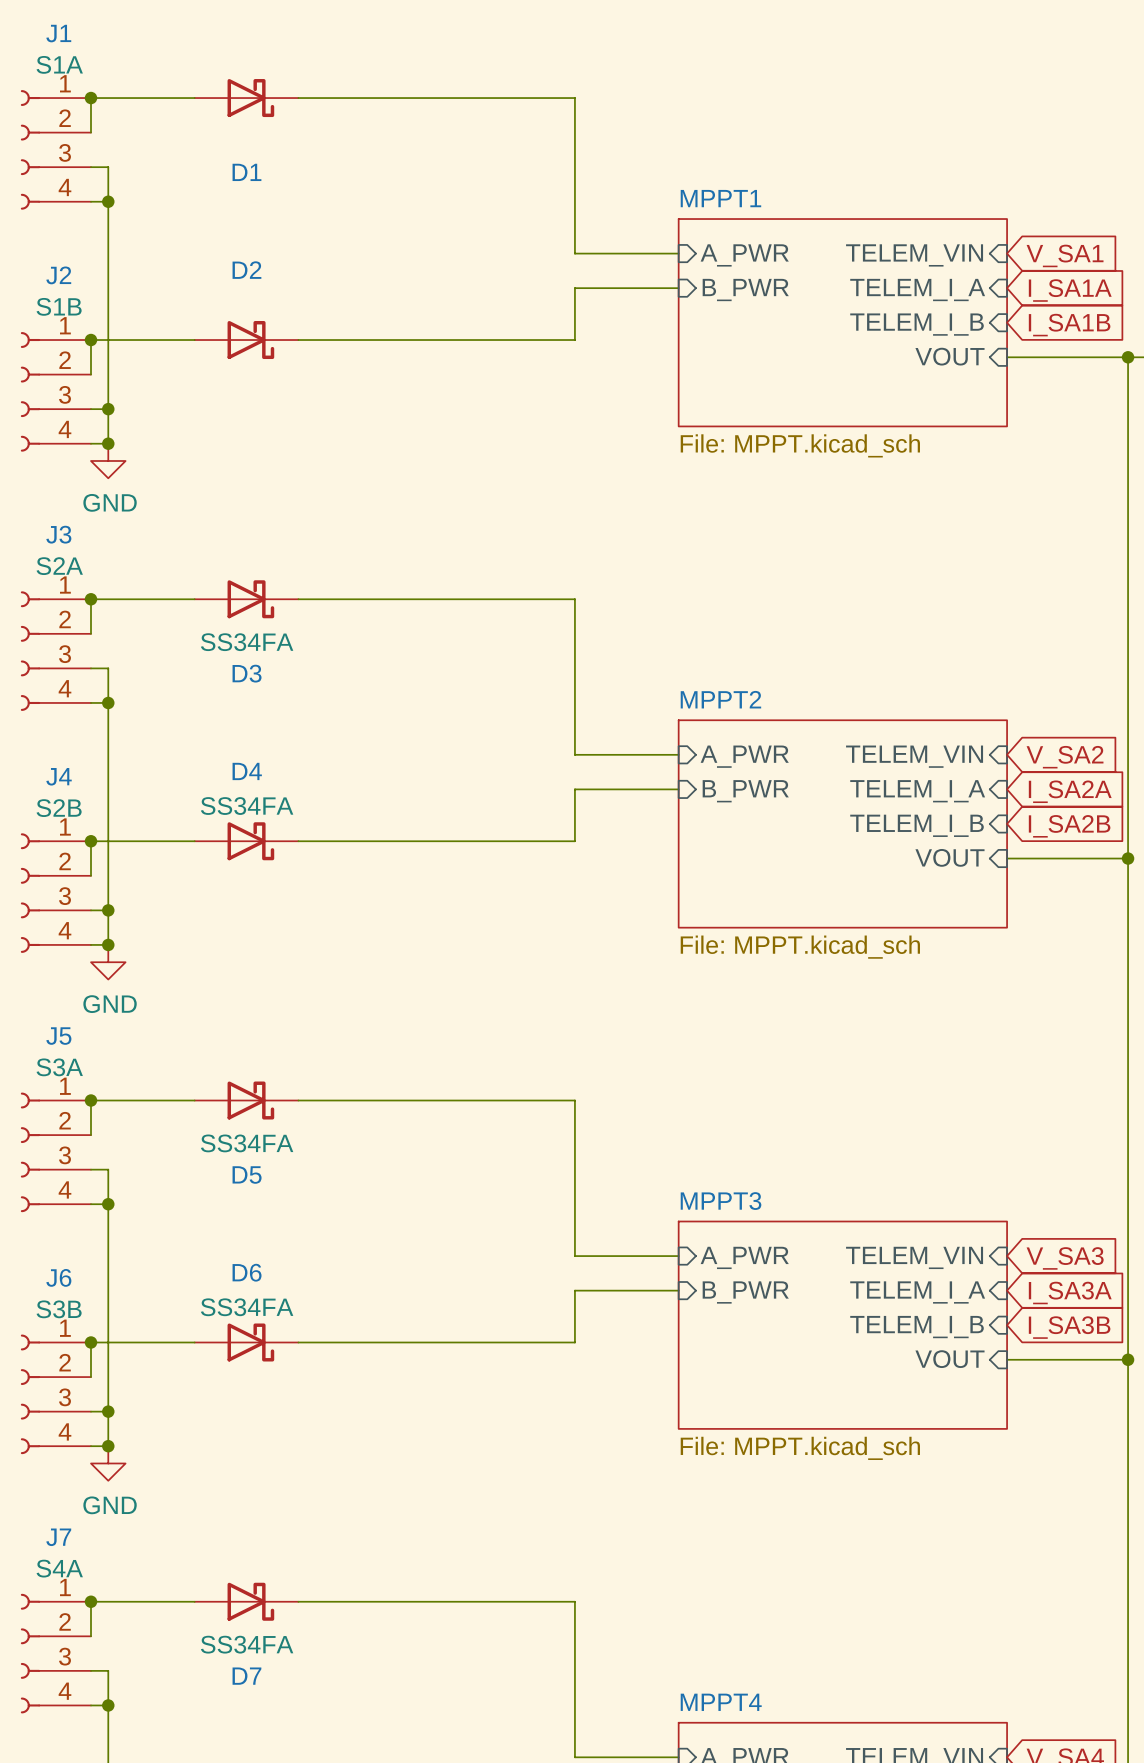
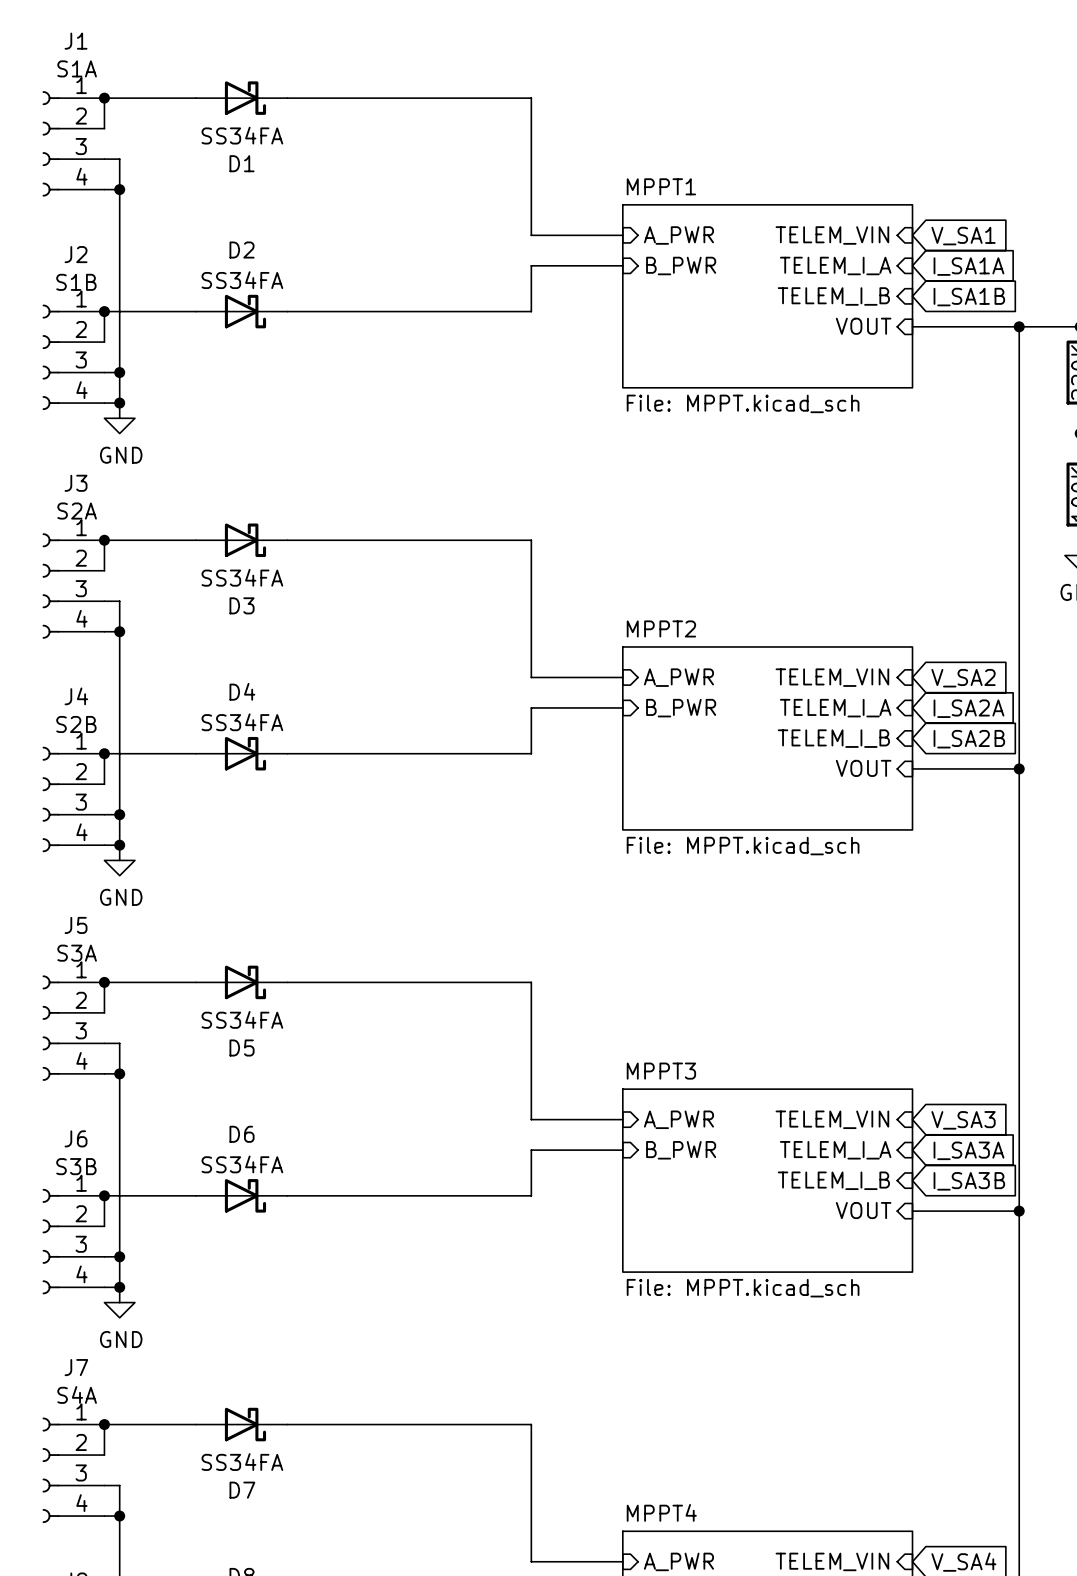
D1 value: none -> SS34FA (242, 135)
D2 value: none -> SS34FA (242, 280)

